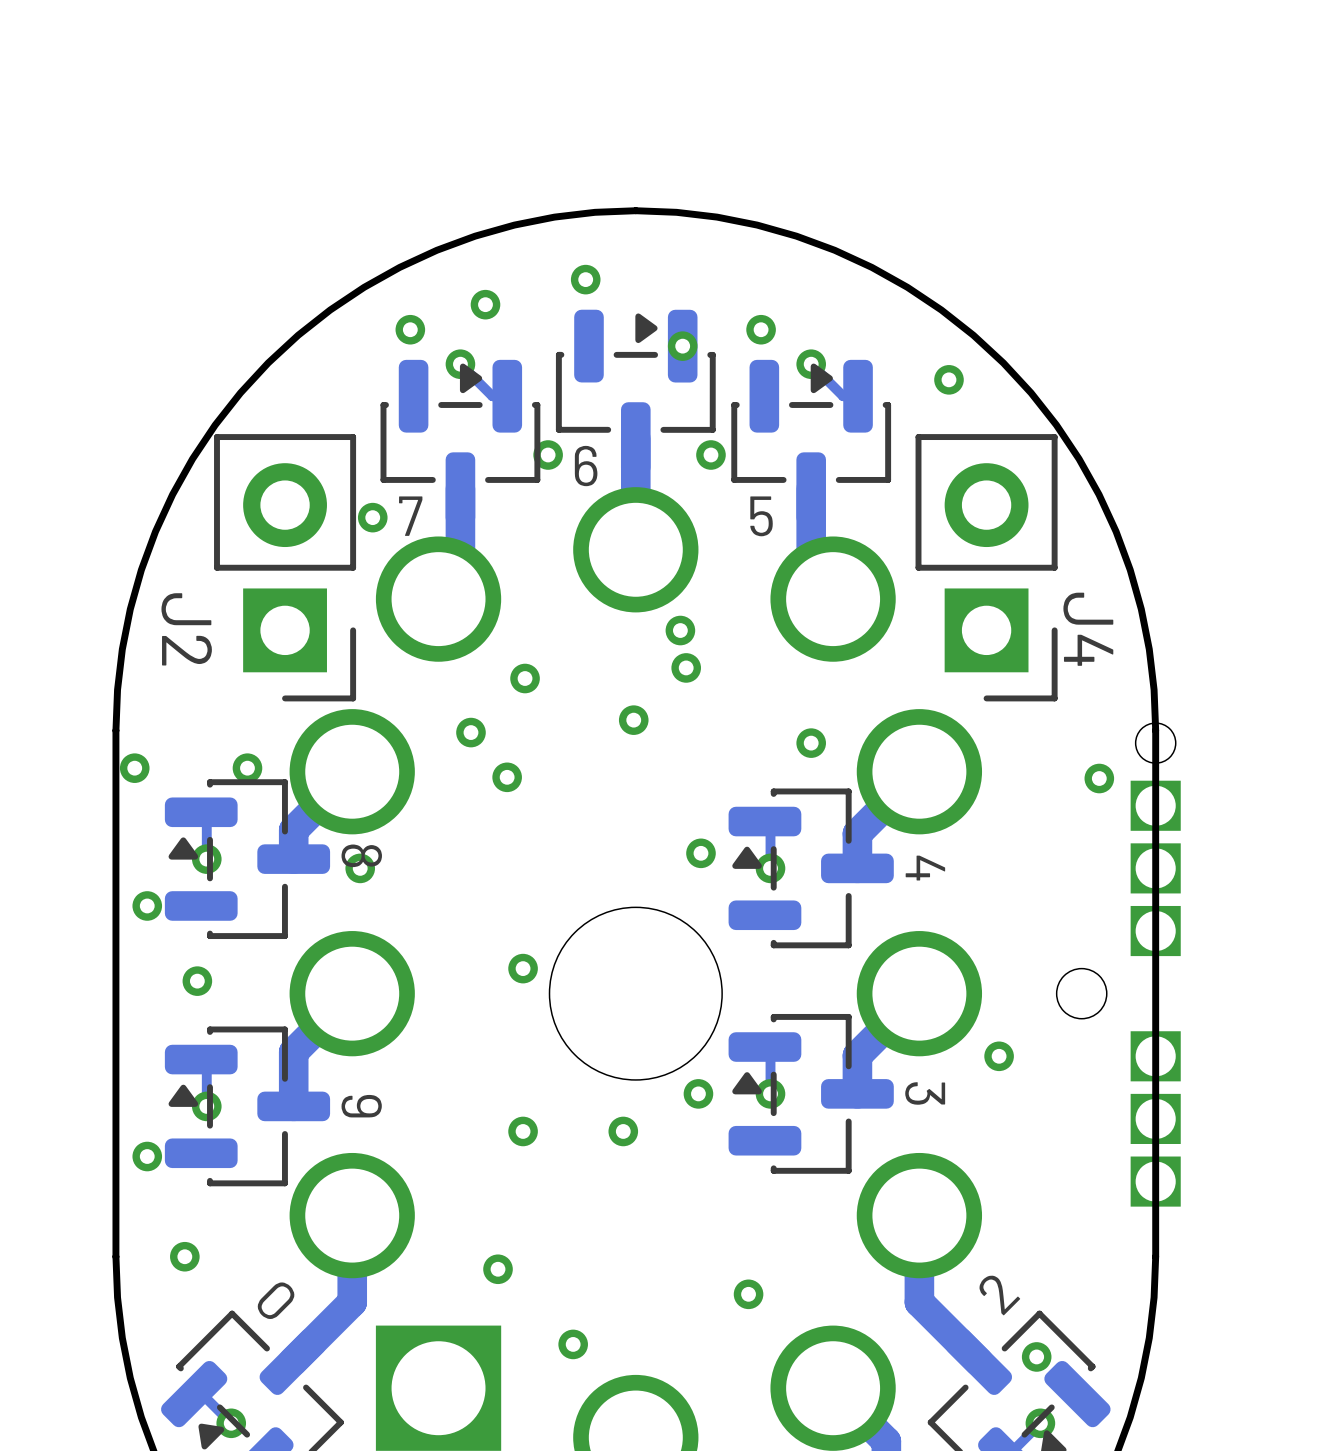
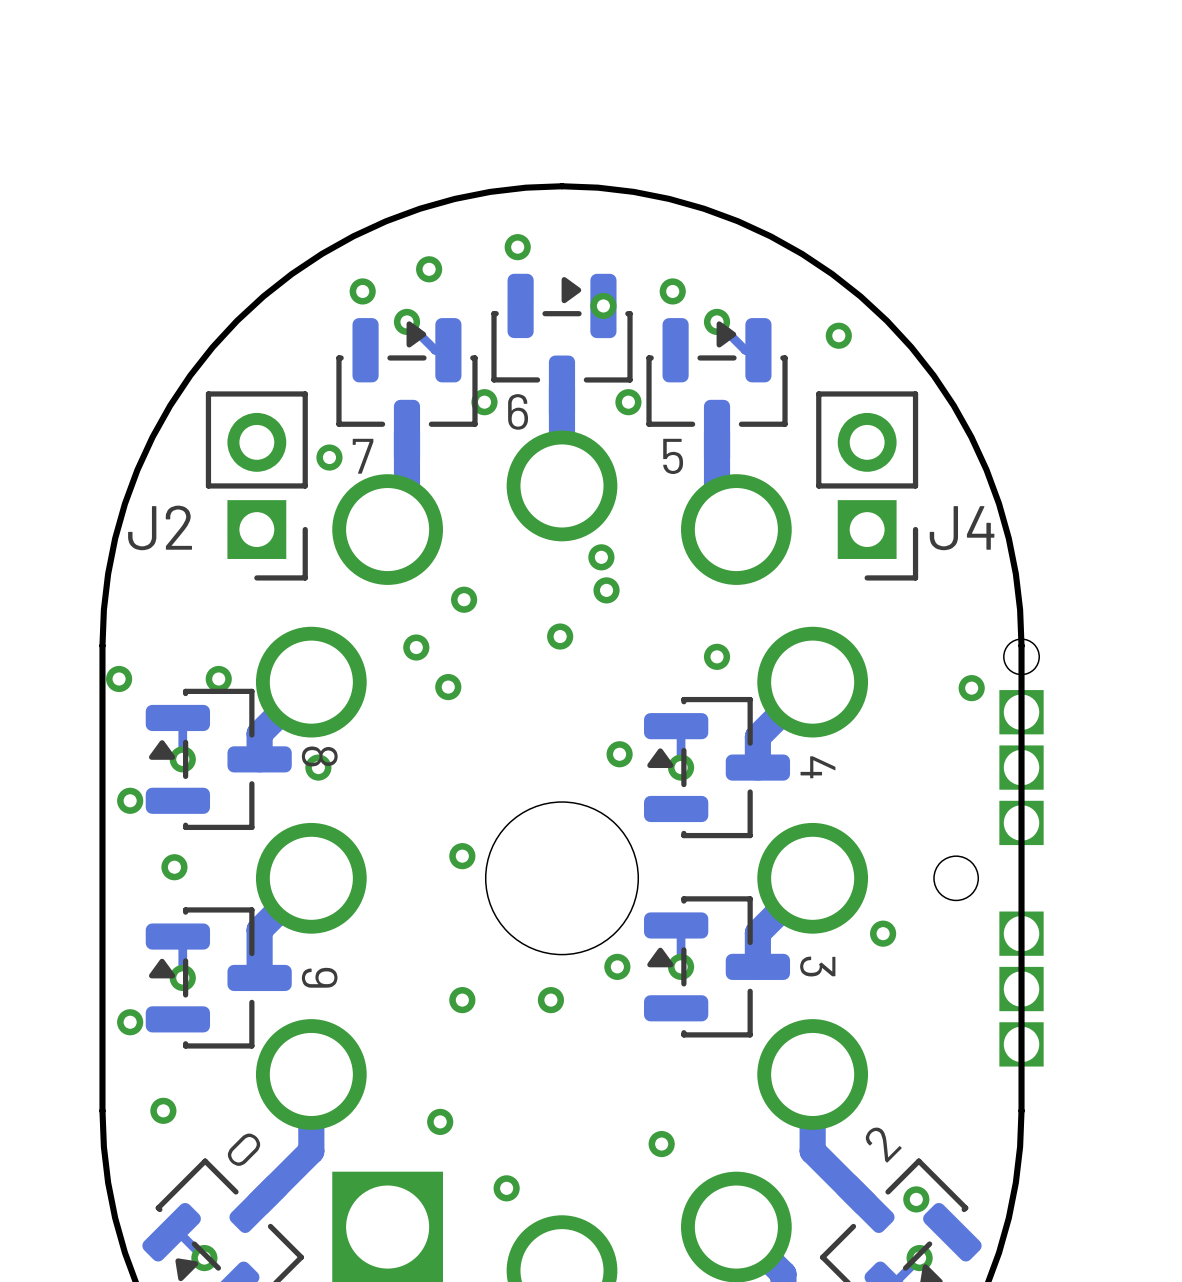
J2 footprint: [214, 434, 357, 702] -> [205, 391, 308, 581]
J4 footprint: [915, 434, 1058, 702] -> [816, 391, 919, 581]
J2 name rotation: 0° (186, 629) -> 90° counterclockwise (160, 527)
J4 name rotation: 0° (1088, 629) -> 90° counterclockwise (962, 528)

